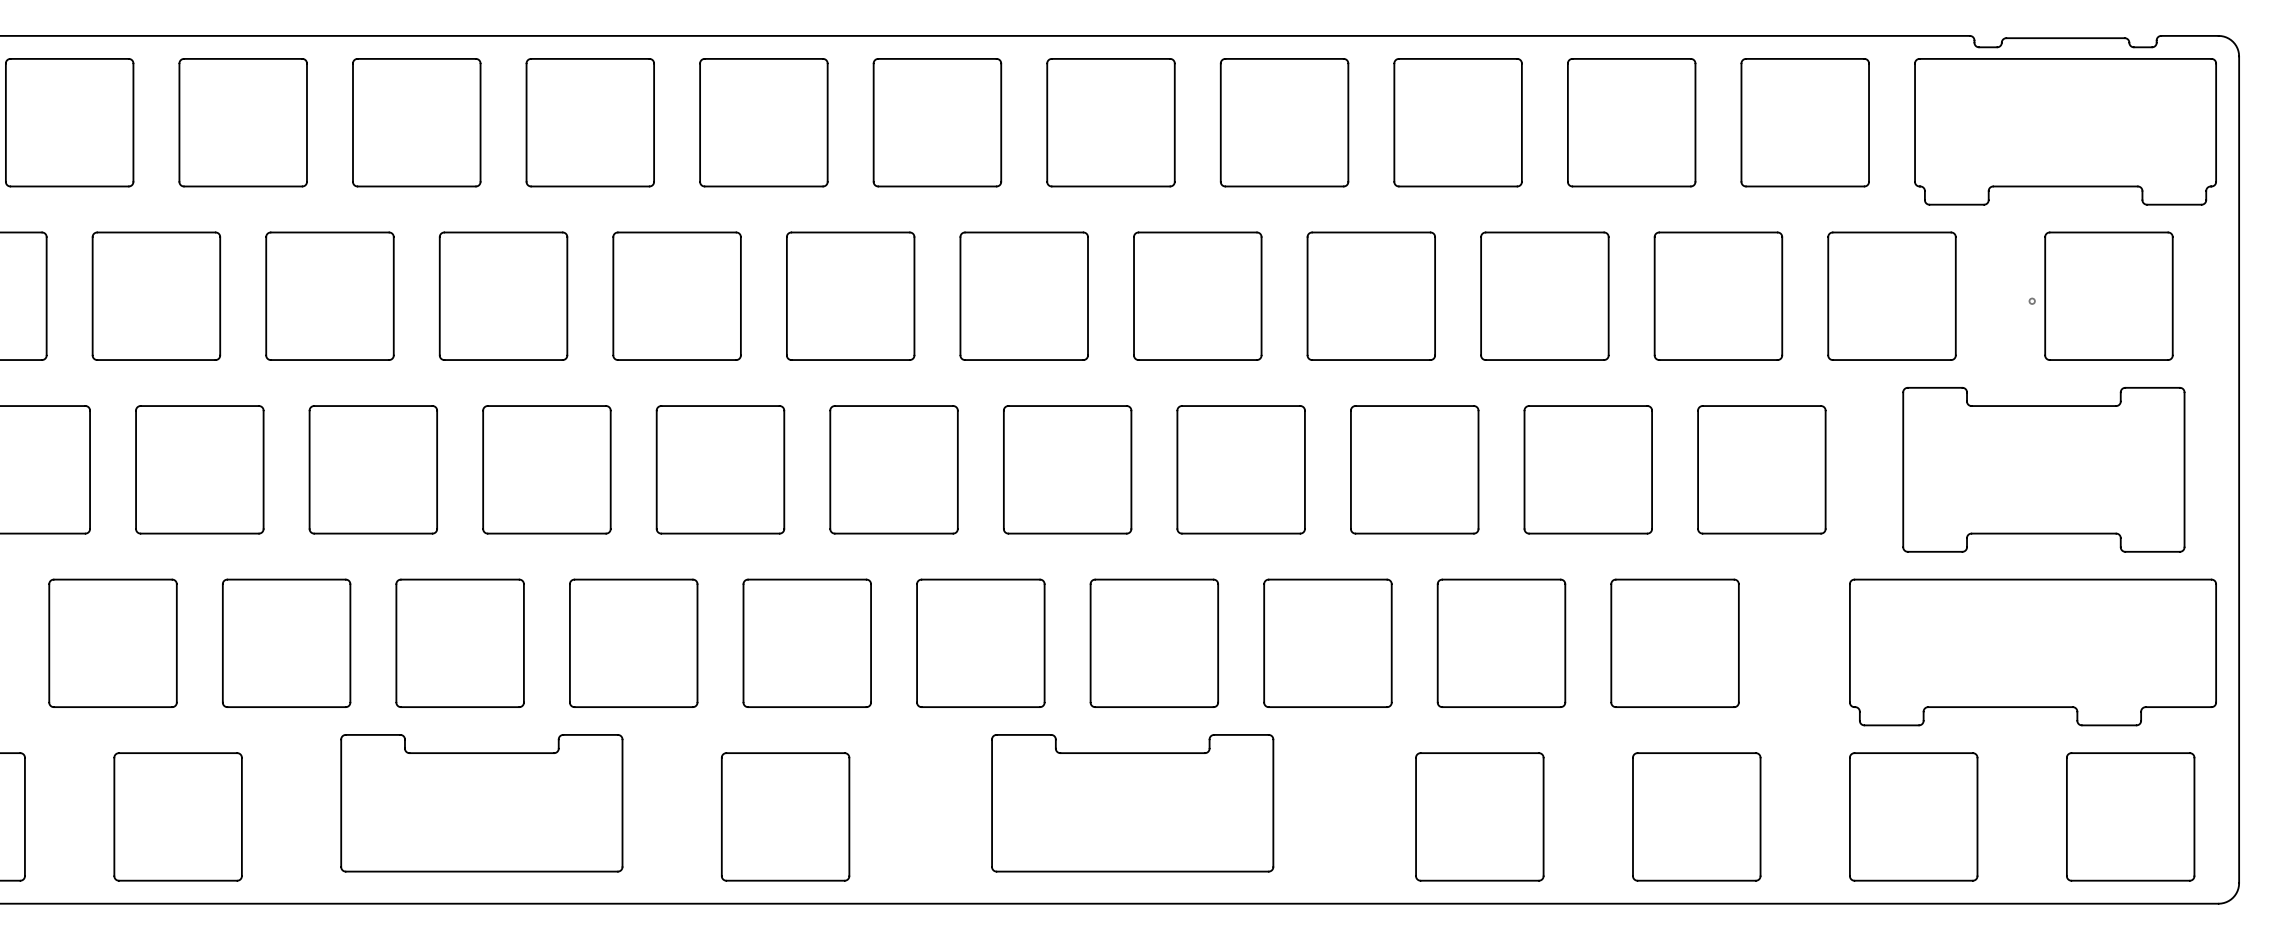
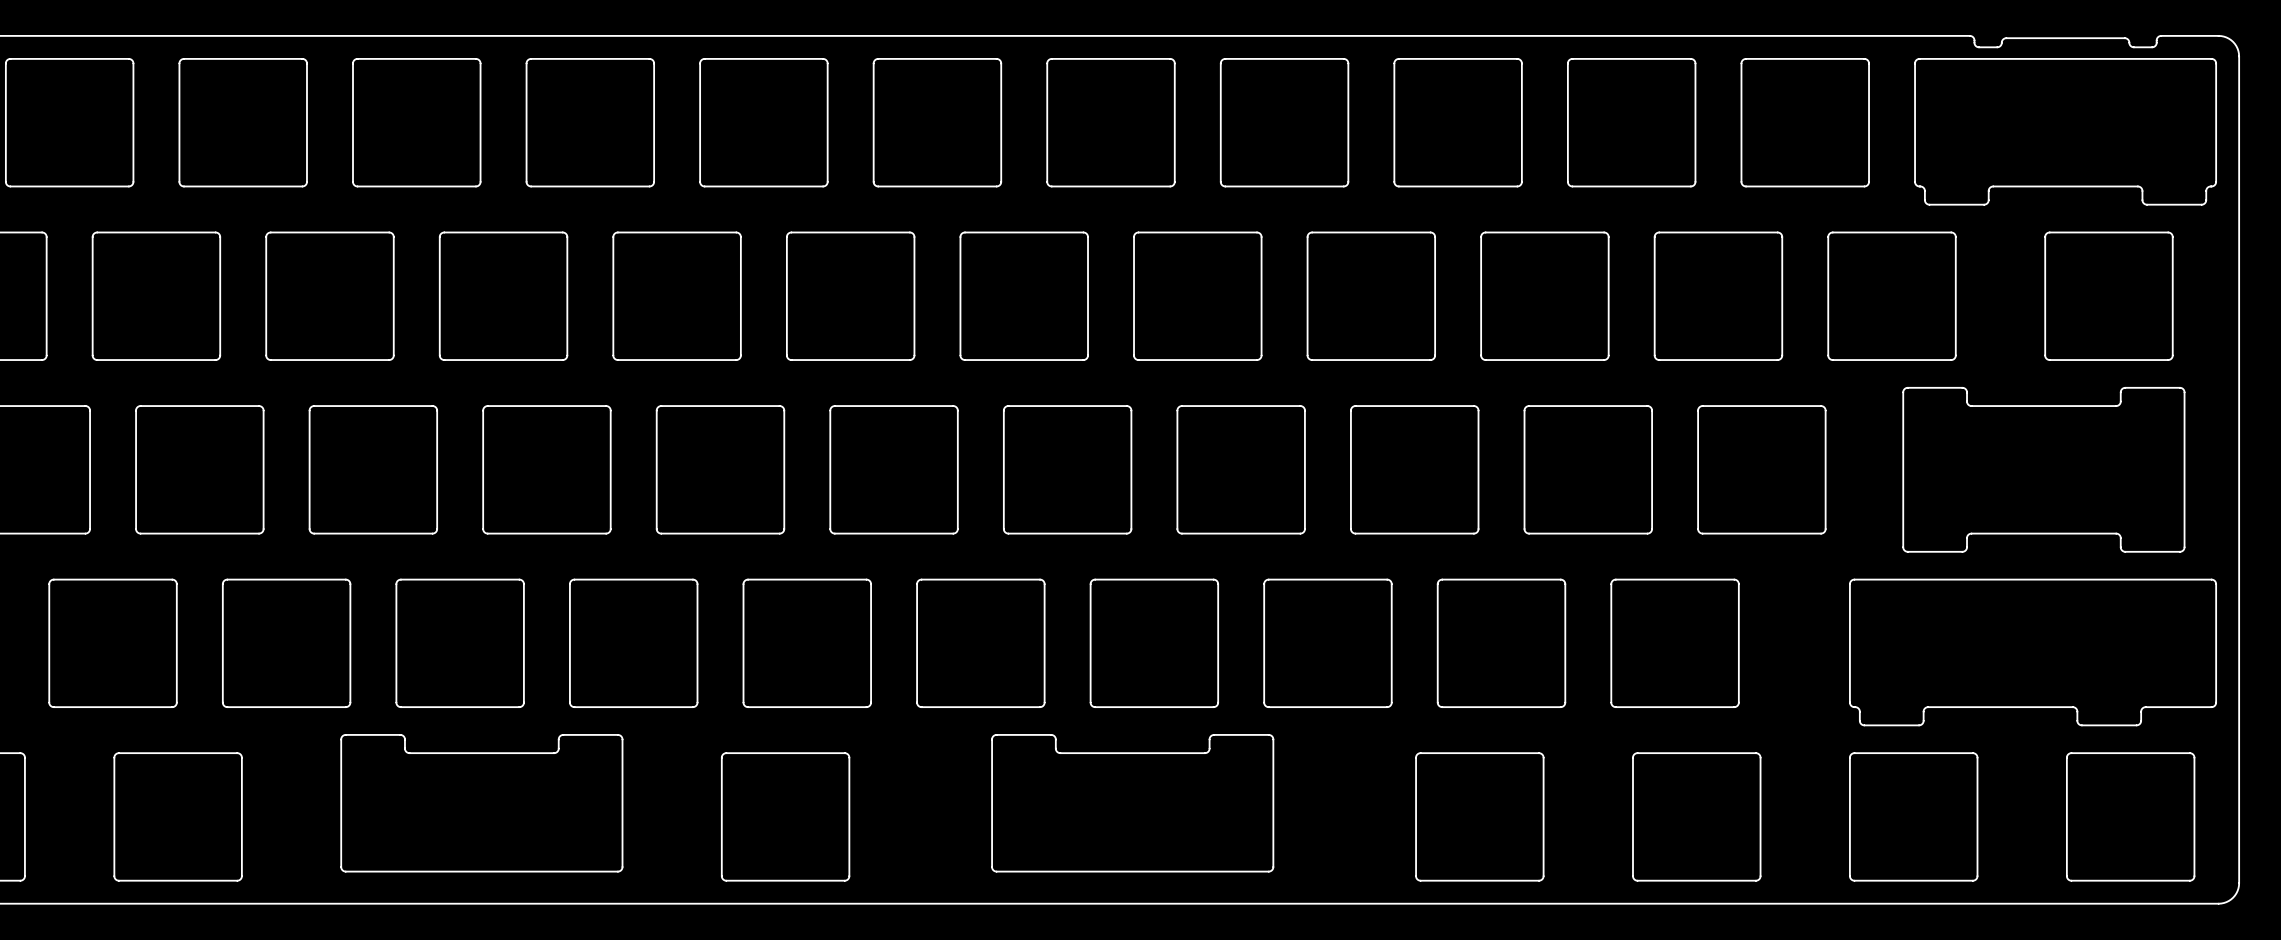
via: (2032, 301) -> none

